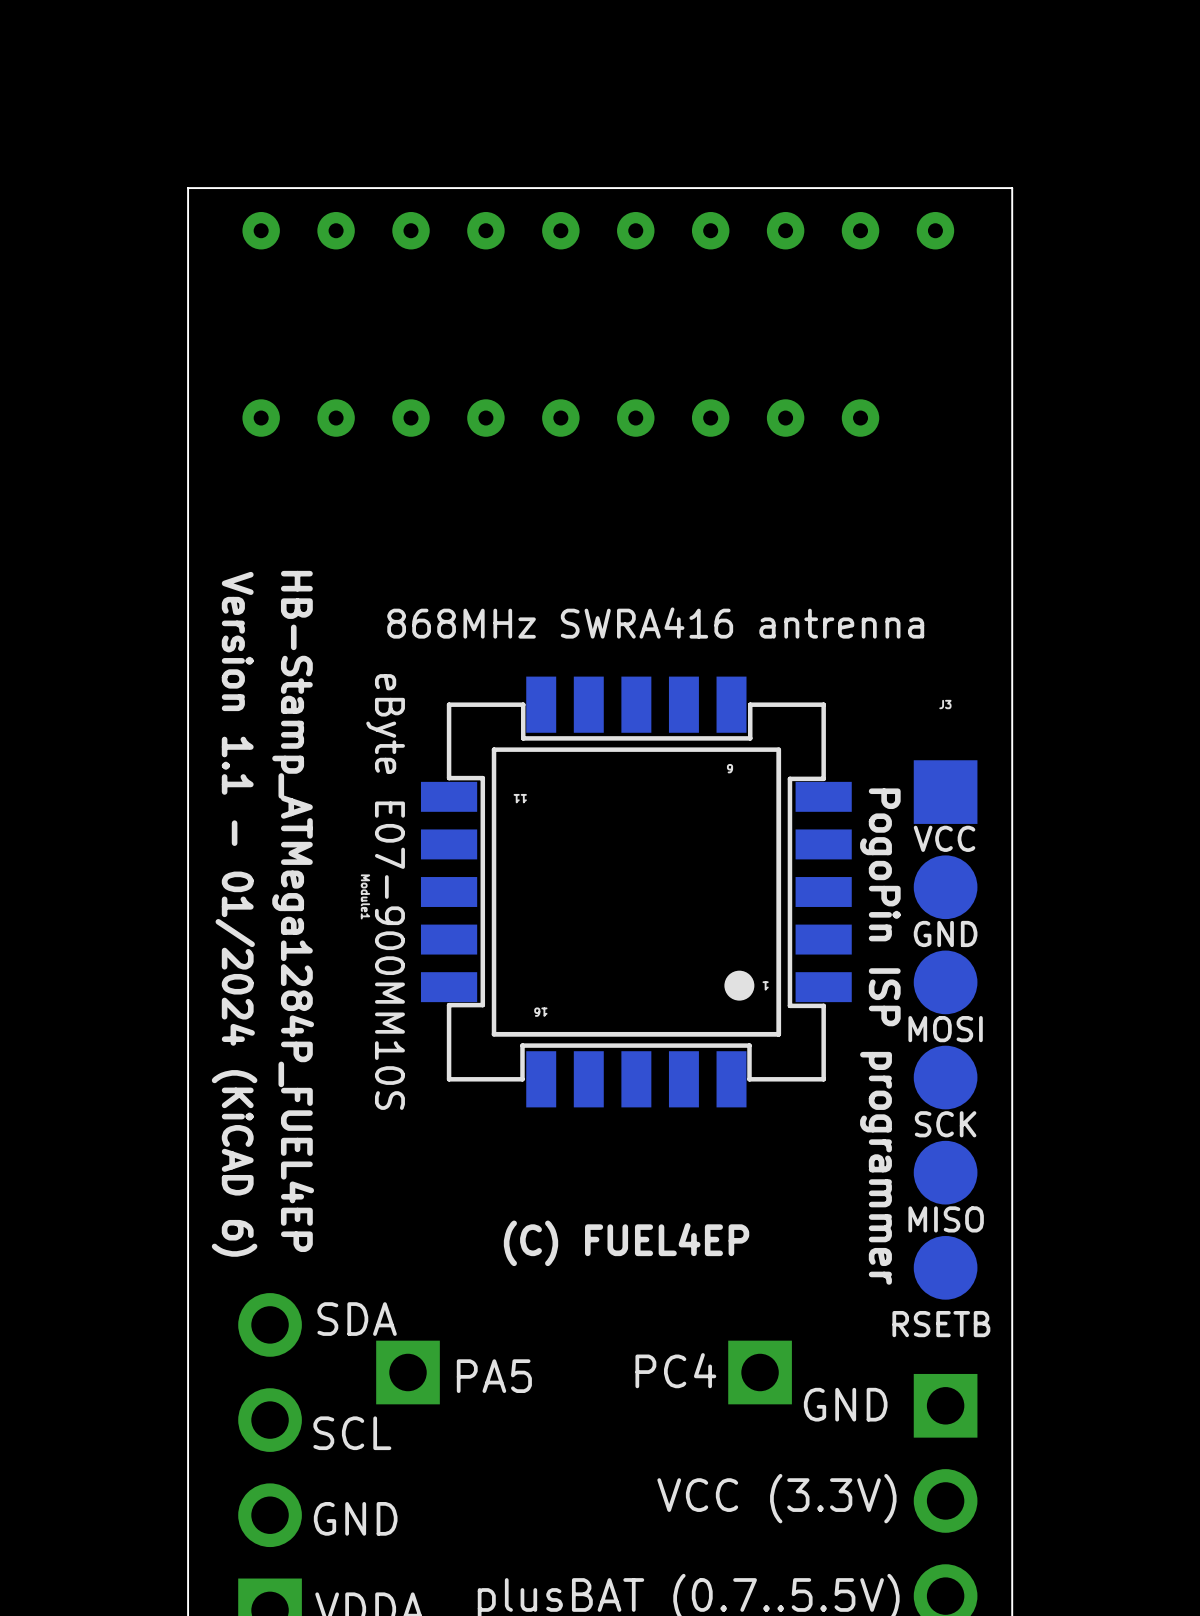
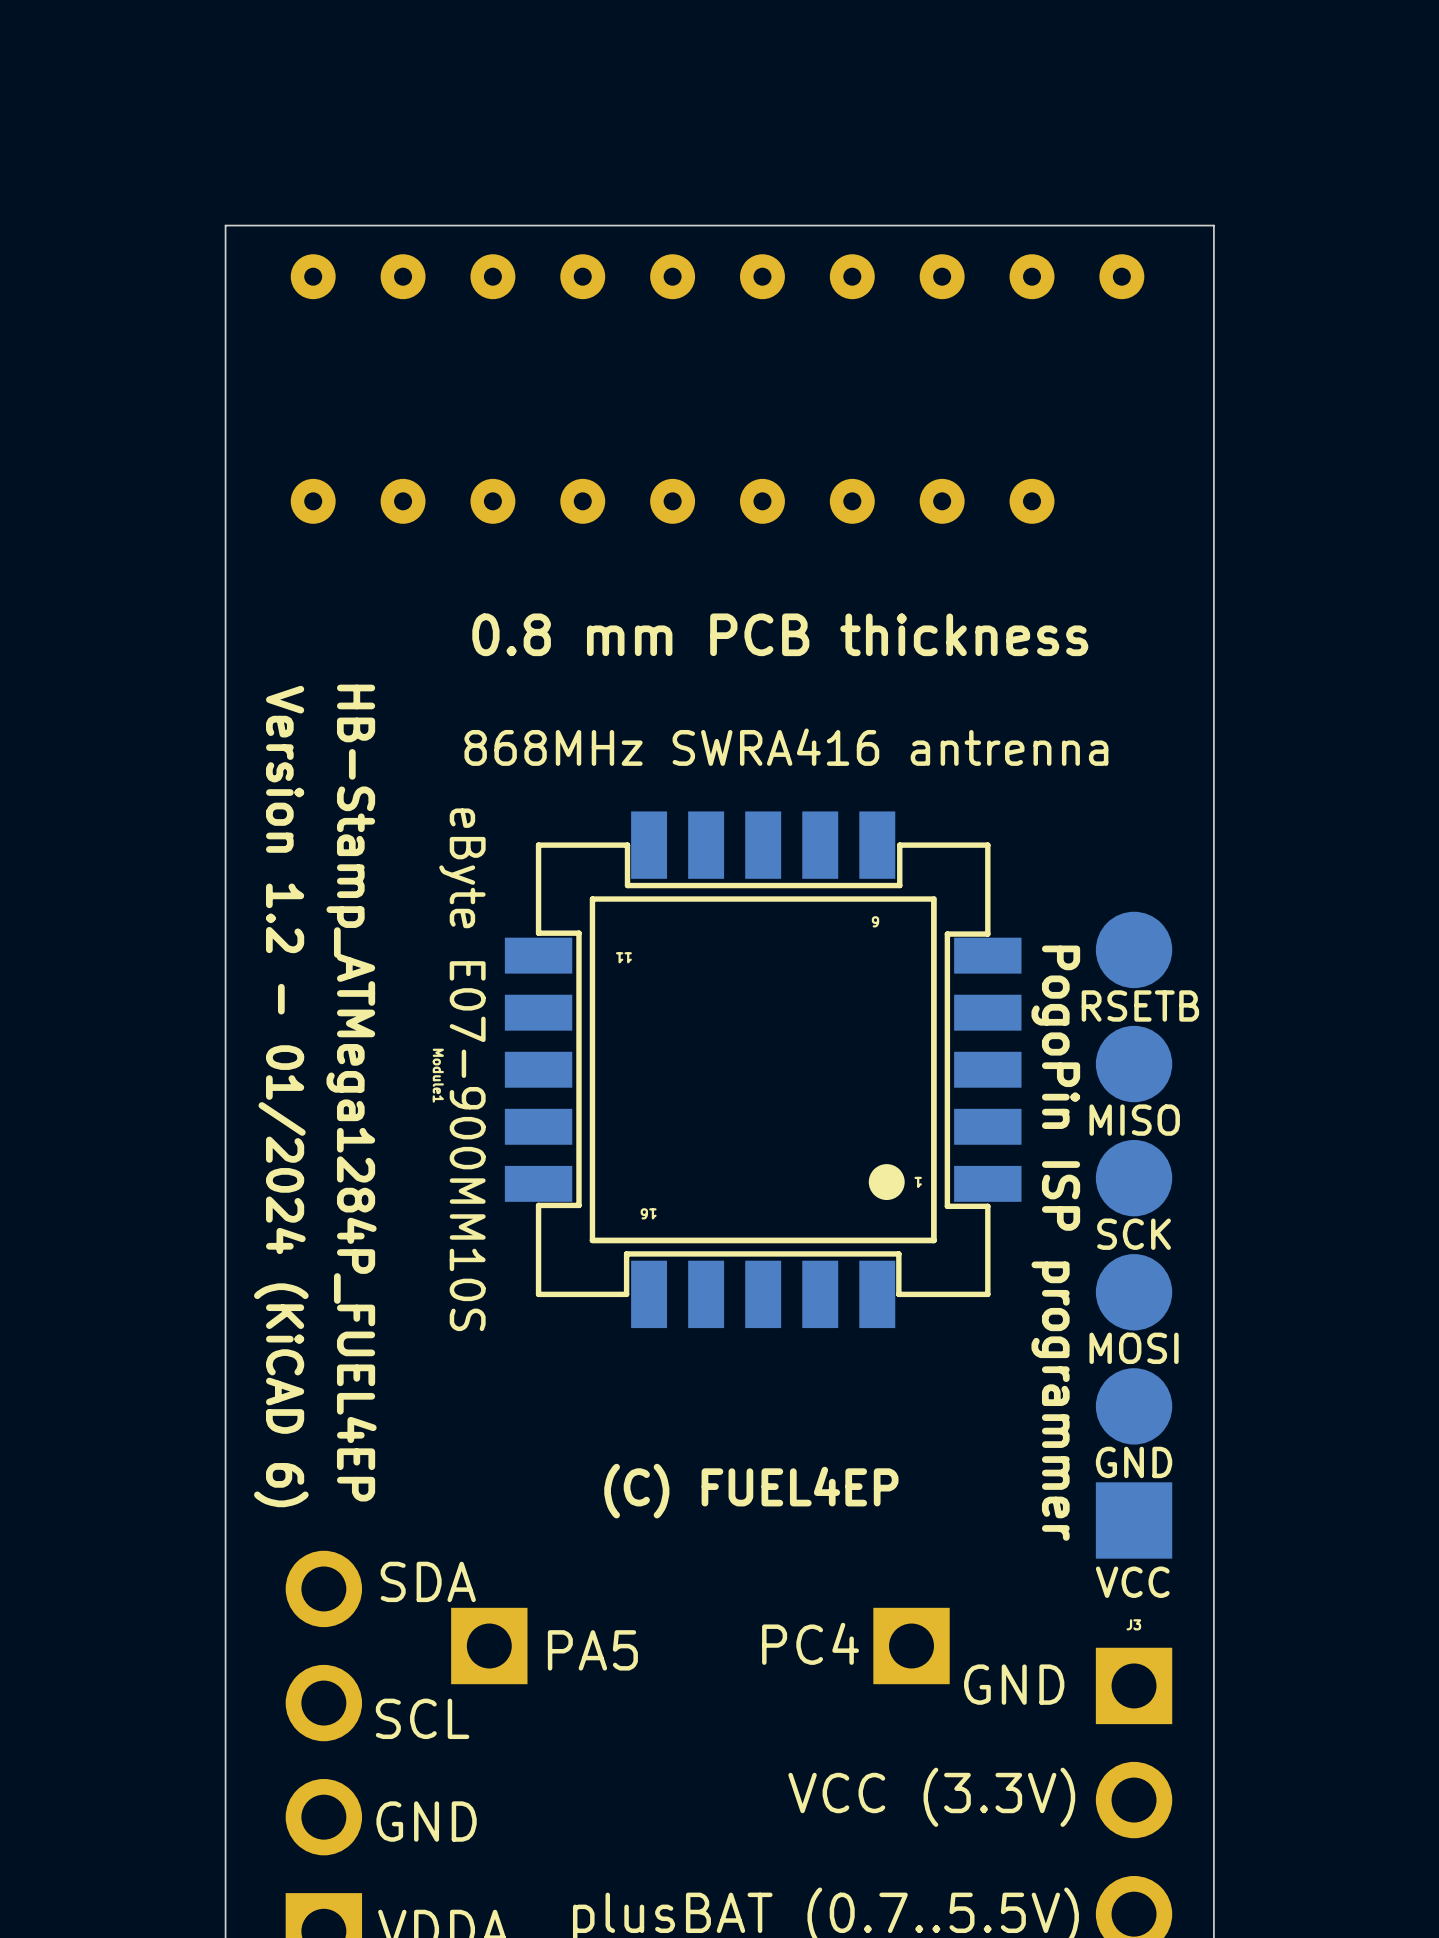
text: none -> 0.8 mm PCB thickness (780, 634)
text: VCC (944, 838) -> RSETB (1140, 1005)
text: Version 1.1 - 01/2024 (KiCAD 6) (234, 914) -> Version 1.2 - 01/2024 (KiCAD 6) (281, 1096)
text: GND (945, 933) -> MISO (1134, 1120)
J3 rotation: 0° (945, 1029) -> 180° (1134, 1235)
text: MOSI (945, 1029) -> SCK (1134, 1234)
text: SCK (945, 1124) -> MOSI (1134, 1348)
text: MISO (946, 1219) -> GND (1134, 1462)
text: RSETB (941, 1324) -> VCC (1132, 1582)

